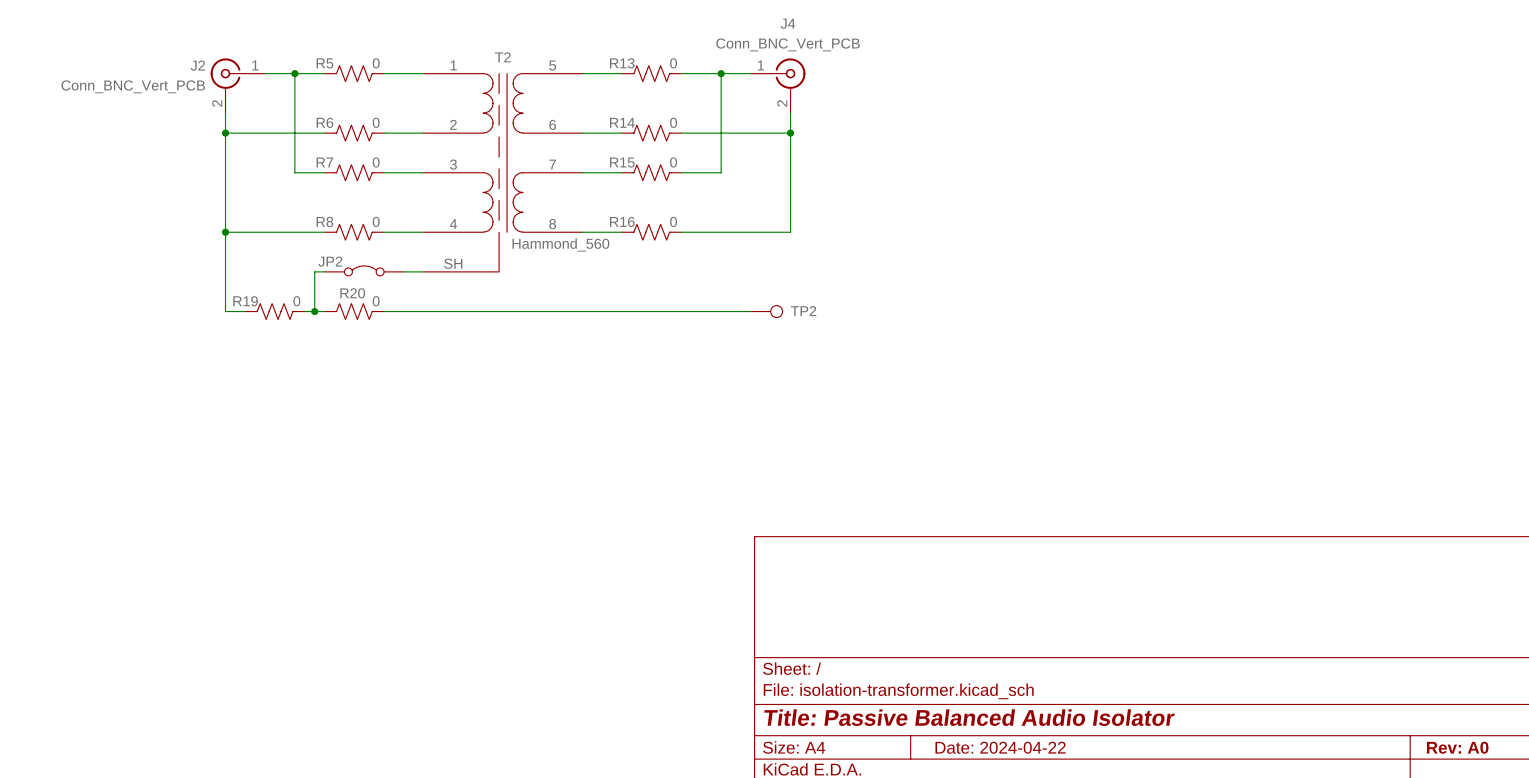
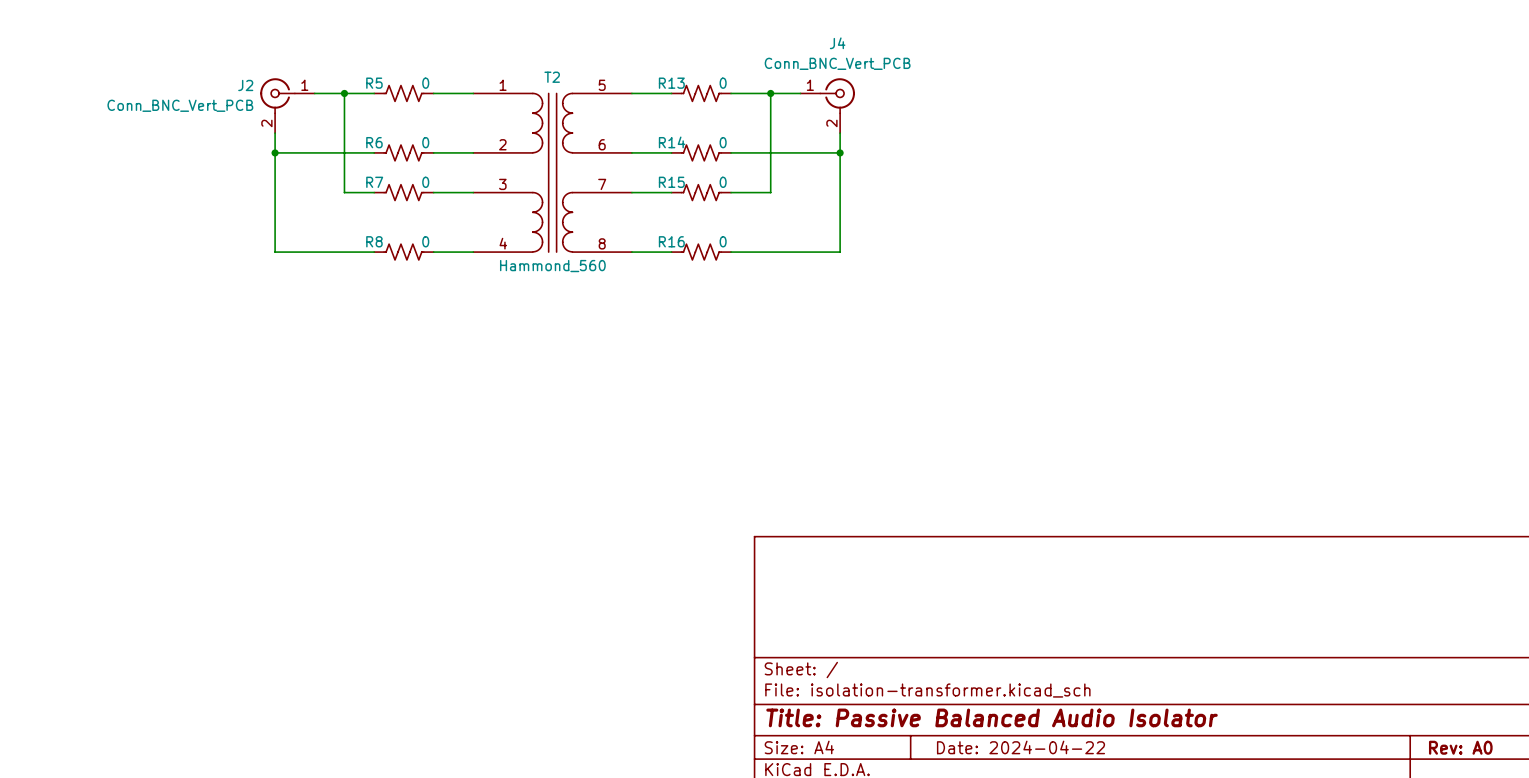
T2 name position: T2 (502, 57) -> T2 (552, 77)
wire: (265, 73) (324, 73) -> (314, 93) (374, 93)
wire: (294, 73) (294, 172) (324, 172) -> (344, 93) (344, 192) (374, 192)
junction: (294, 73) -> none
R5 position: (354, 73) -> (403, 93)
wire: (384, 73) (423, 73) -> (433, 93) (473, 93)
T2 symbol: [423, 73, 583, 272] -> [473, 93, 632, 253]
wire: (582, 73) (622, 73) -> (631, 93) (671, 93)
R13 position: (651, 73) -> (701, 93)
wire: (681, 73) (750, 73) -> (731, 93) (800, 93)
wire: (721, 73) (721, 172) (681, 172) -> (770, 93) (770, 192) (731, 192)
junction: (721, 73) -> none
J2 position: (237, 85) -> (287, 105)
J4 position: (778, 85) -> (827, 105)
junction: none -> (344, 93)
junction: none -> (770, 93)
wire: (225, 113) (225, 311) (245, 311) -> none
wire: (790, 113) (790, 232) (681, 232) -> (840, 133) (840, 252) (731, 252)
wire: (225, 133) (324, 133) -> (275, 152) (374, 152)
junction: (225, 133) -> none
wire: none -> (275, 133) (275, 252) (374, 252)
R6 position: (354, 133) -> (403, 152)
wire: (384, 133) (423, 133) -> (433, 152) (473, 152)
wire: (582, 133) (622, 133) -> (631, 152) (671, 152)
R14 position: (651, 133) -> (701, 152)
wire: (681, 133) (790, 133) -> (731, 152) (840, 152)
junction: (790, 133) -> none
junction: none -> (275, 152)
junction: none -> (840, 152)
R7 position: (354, 172) -> (403, 192)
wire: (384, 172) (423, 172) -> (433, 192) (473, 192)
wire: (582, 172) (622, 172) -> (631, 192) (671, 192)
R15 position: (651, 172) -> (701, 192)
wire: (225, 232) (324, 232) -> none
junction: (225, 232) -> none
R8 position: (354, 232) -> (403, 252)
wire: (384, 232) (423, 232) -> (433, 252) (473, 252)
wire: (582, 232) (622, 232) -> (631, 252) (671, 252)
R16 position: (651, 232) -> (701, 252)
T2 value position: Hammond_560 (560, 244) -> Hammond_560 (552, 266)
JP2: (364, 270) -> none
wire: (324, 271) (314, 271) (314, 311) -> none
wire: (403, 271) (423, 271) -> none
R19: 0 (275, 311) -> none
wire: (304, 311) (324, 311) -> none
junction: (314, 311) -> none
R20: 0 (354, 311) -> none
wire: (384, 311) (750, 311) -> none
TP2: (766, 311) -> none

